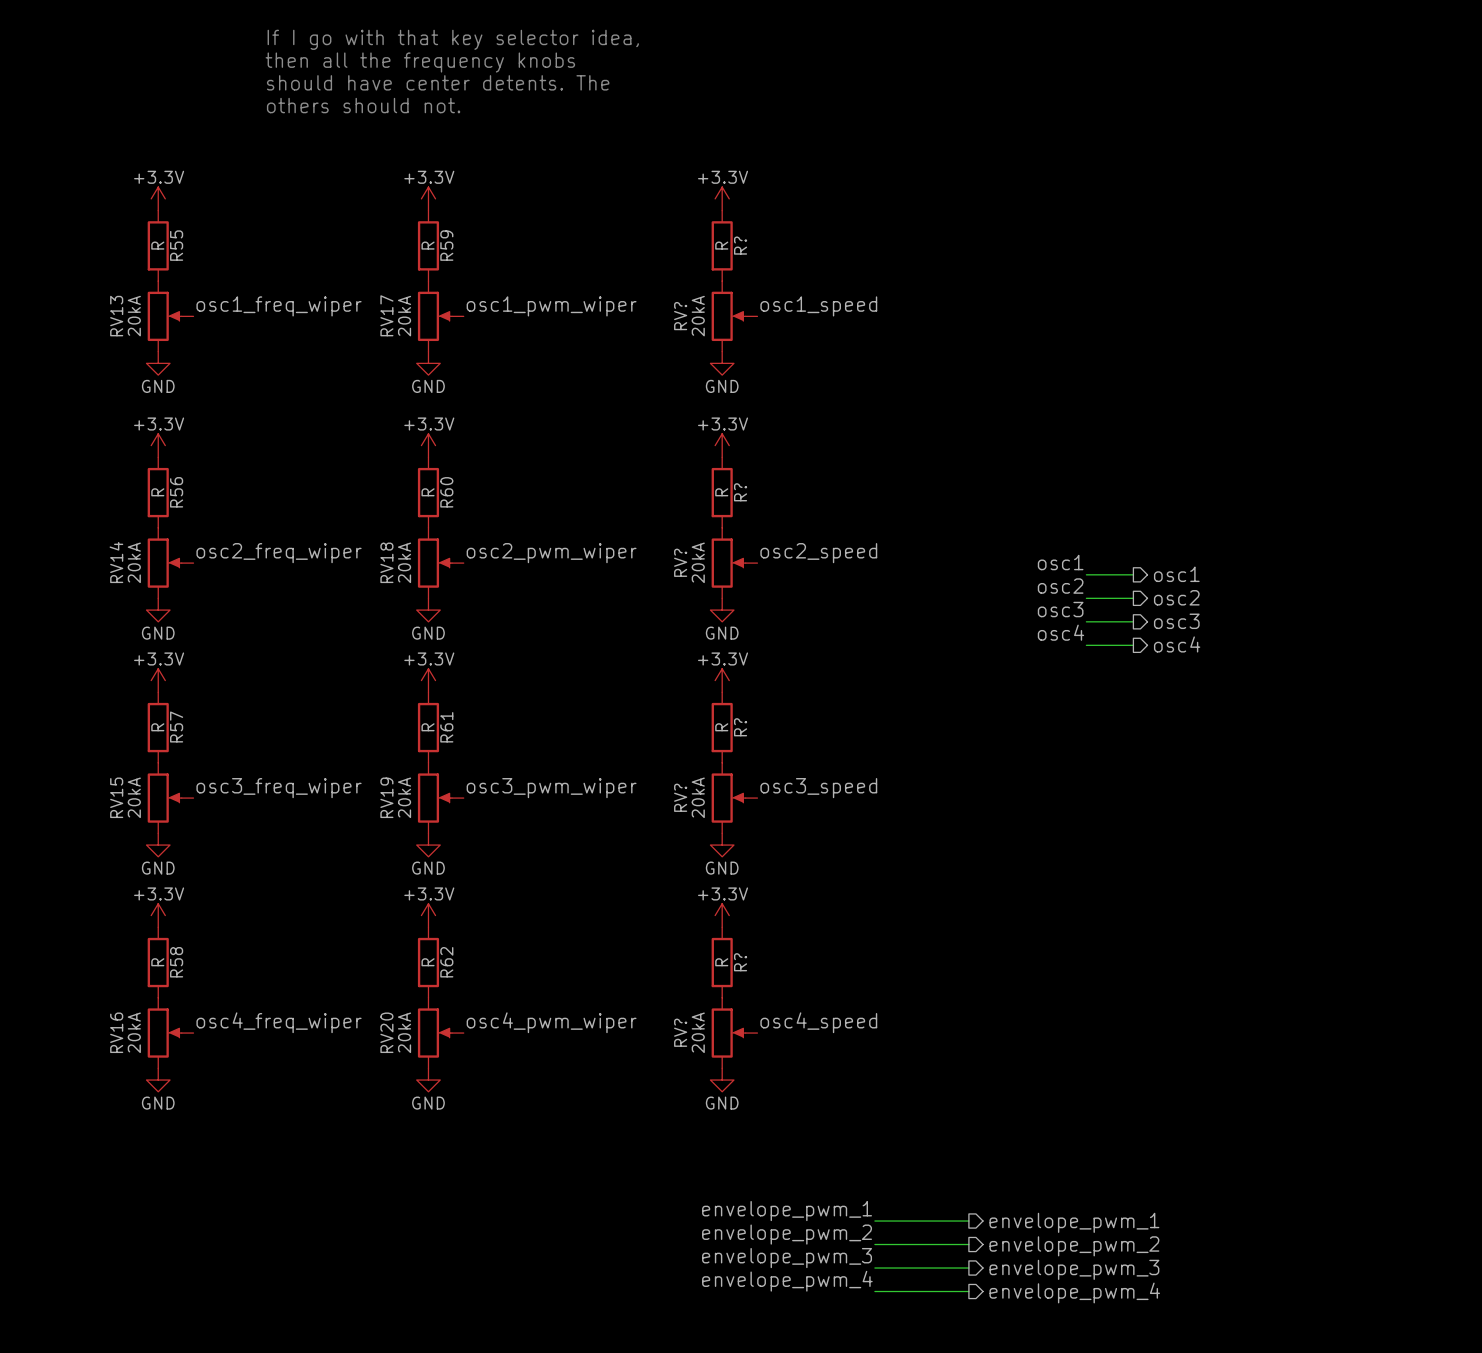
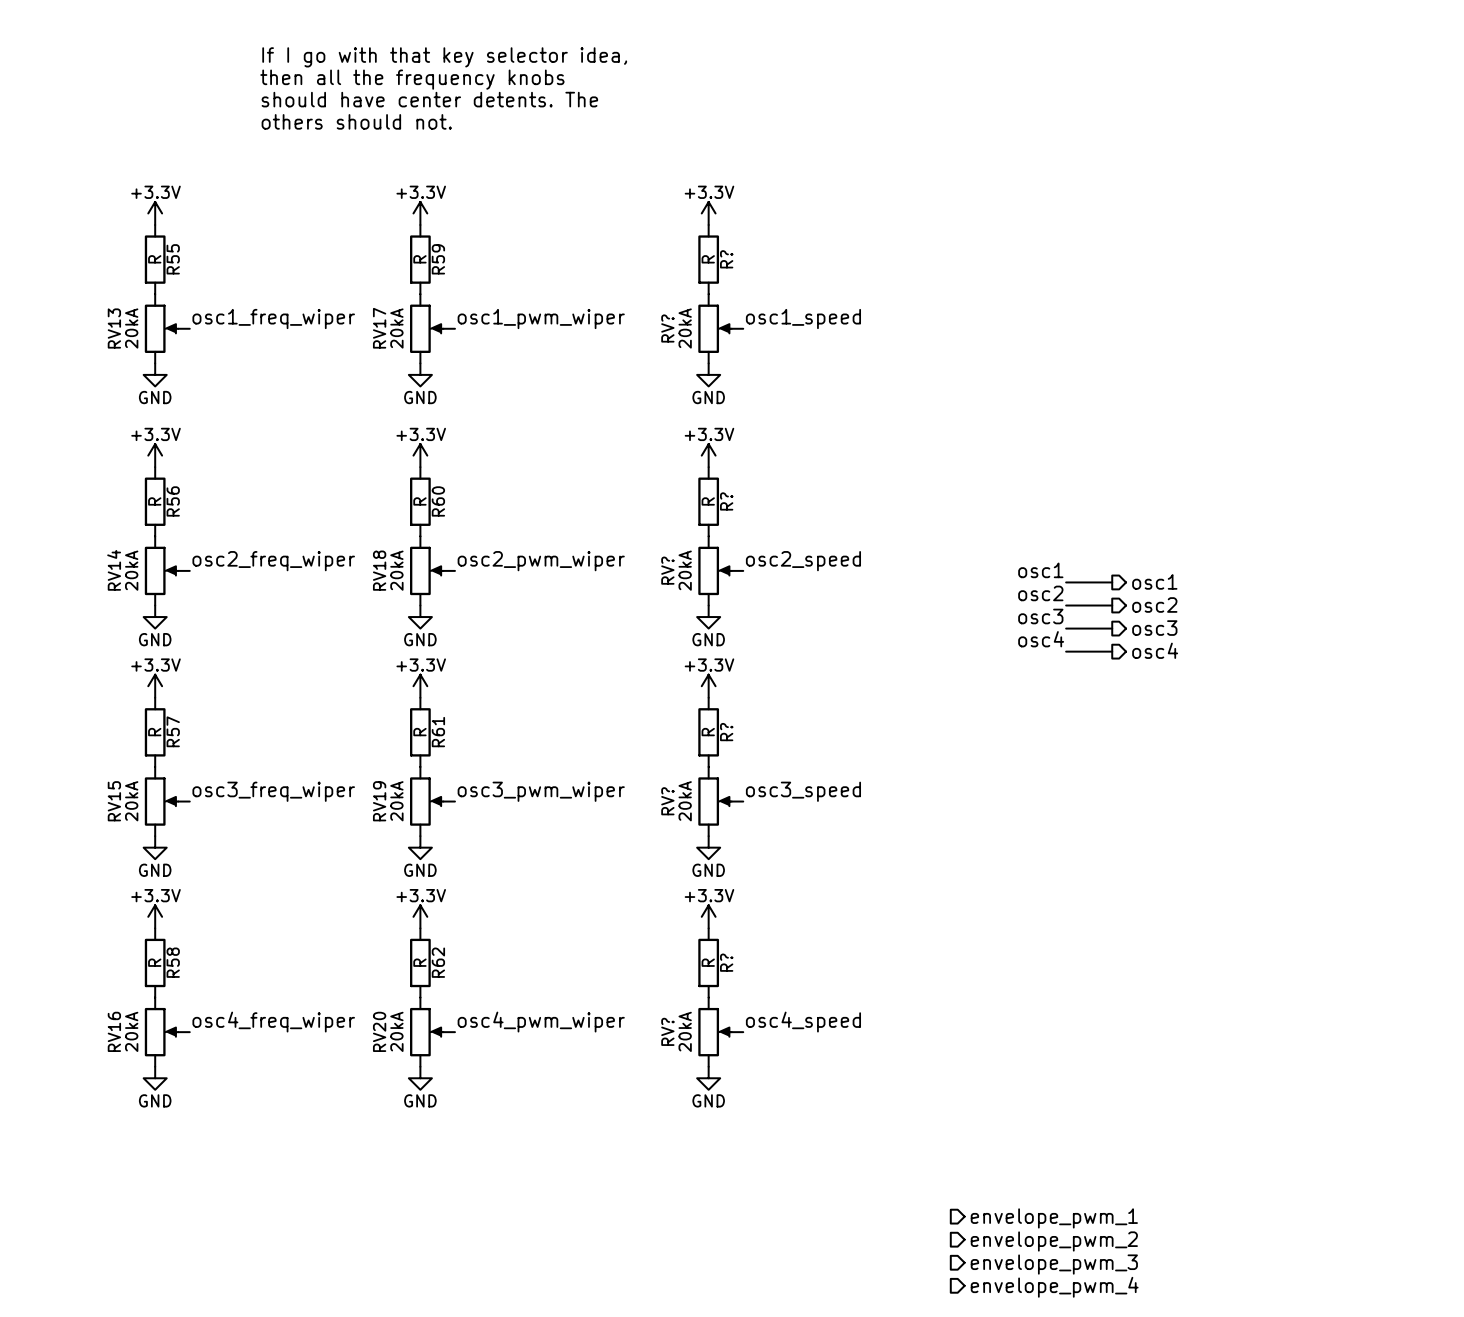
label: envelope_pwm_1 (787, 1211) -> none
wire: (874, 1221) (968, 1221) -> none
label: envelope_pwm_2 (787, 1234) -> none
wire: (874, 1244) (968, 1244) -> none
label: envelope_pwm_3 (787, 1258) -> none
wire: (874, 1268) (968, 1268) -> none
label: envelope_pwm_4 (787, 1281) -> none
wire: (874, 1291) (968, 1291) -> none

